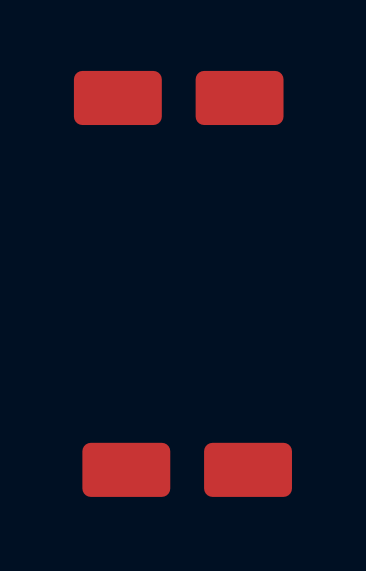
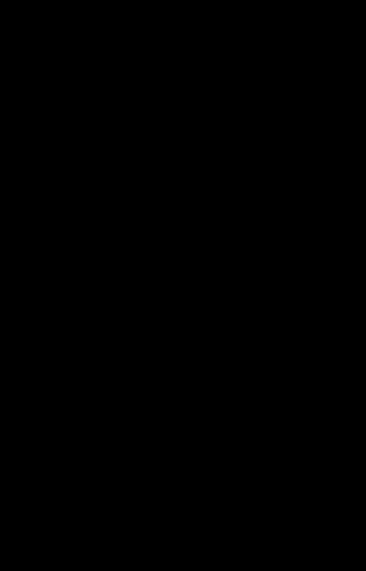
part: (178, 97) -> none
part: (187, 469) -> none

